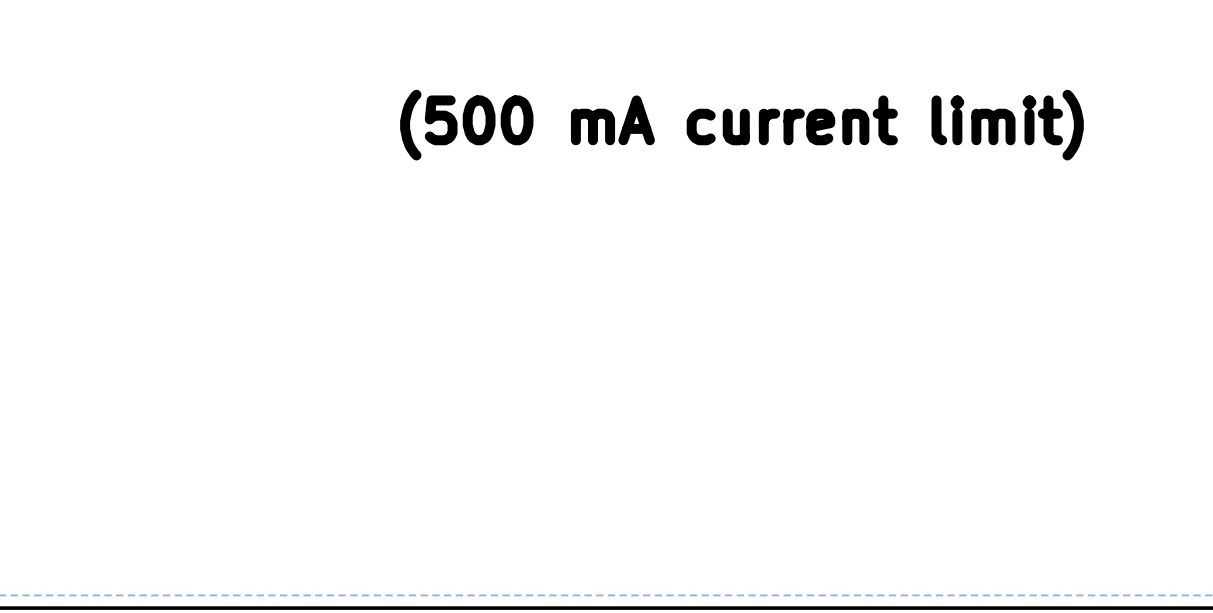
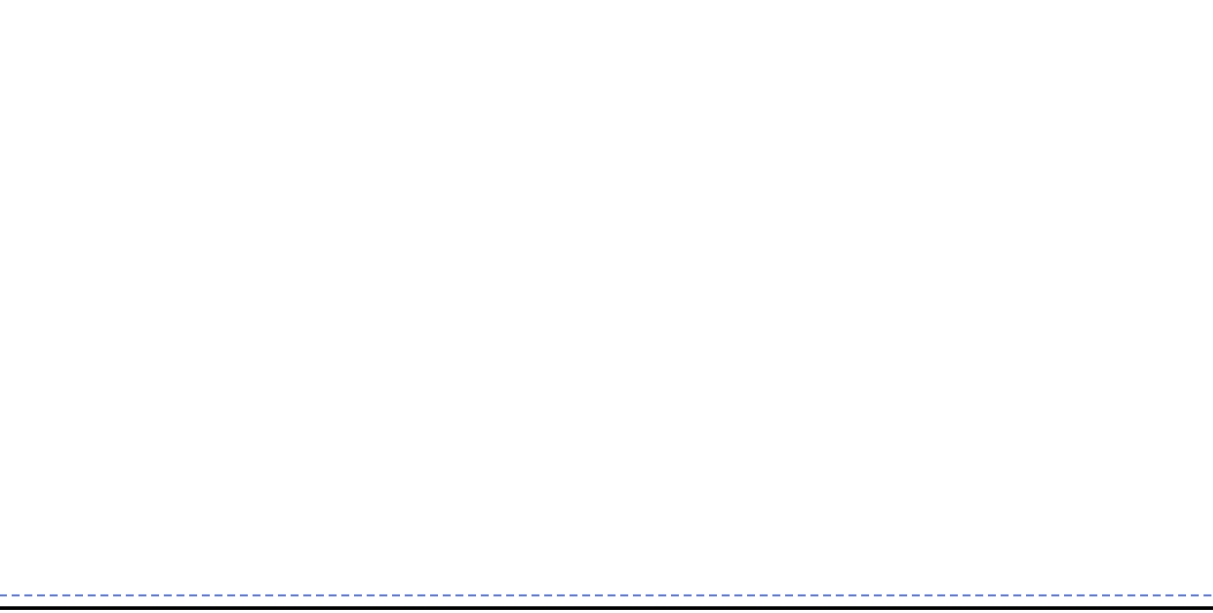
text: (500 mA current limit) (741, 125) -> none

